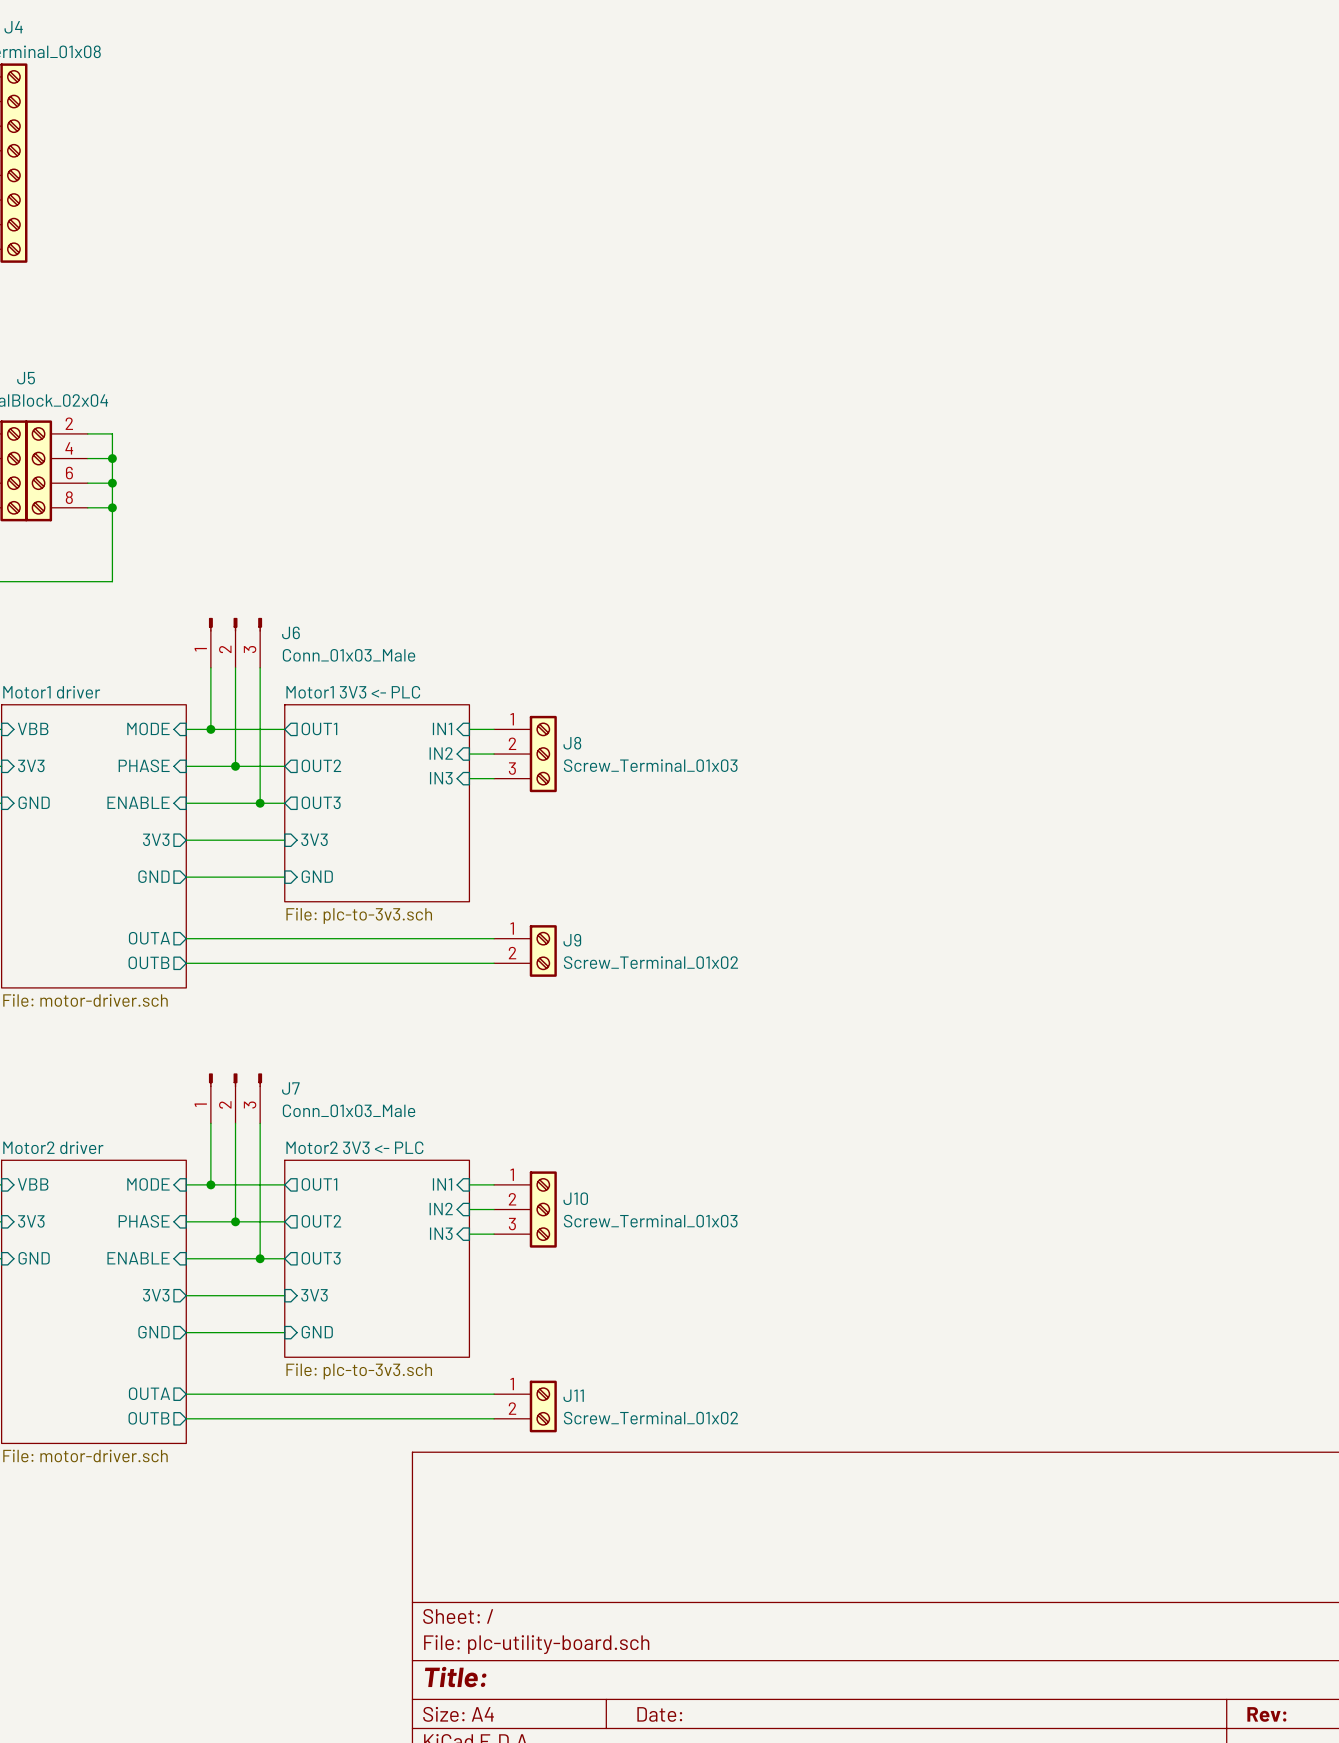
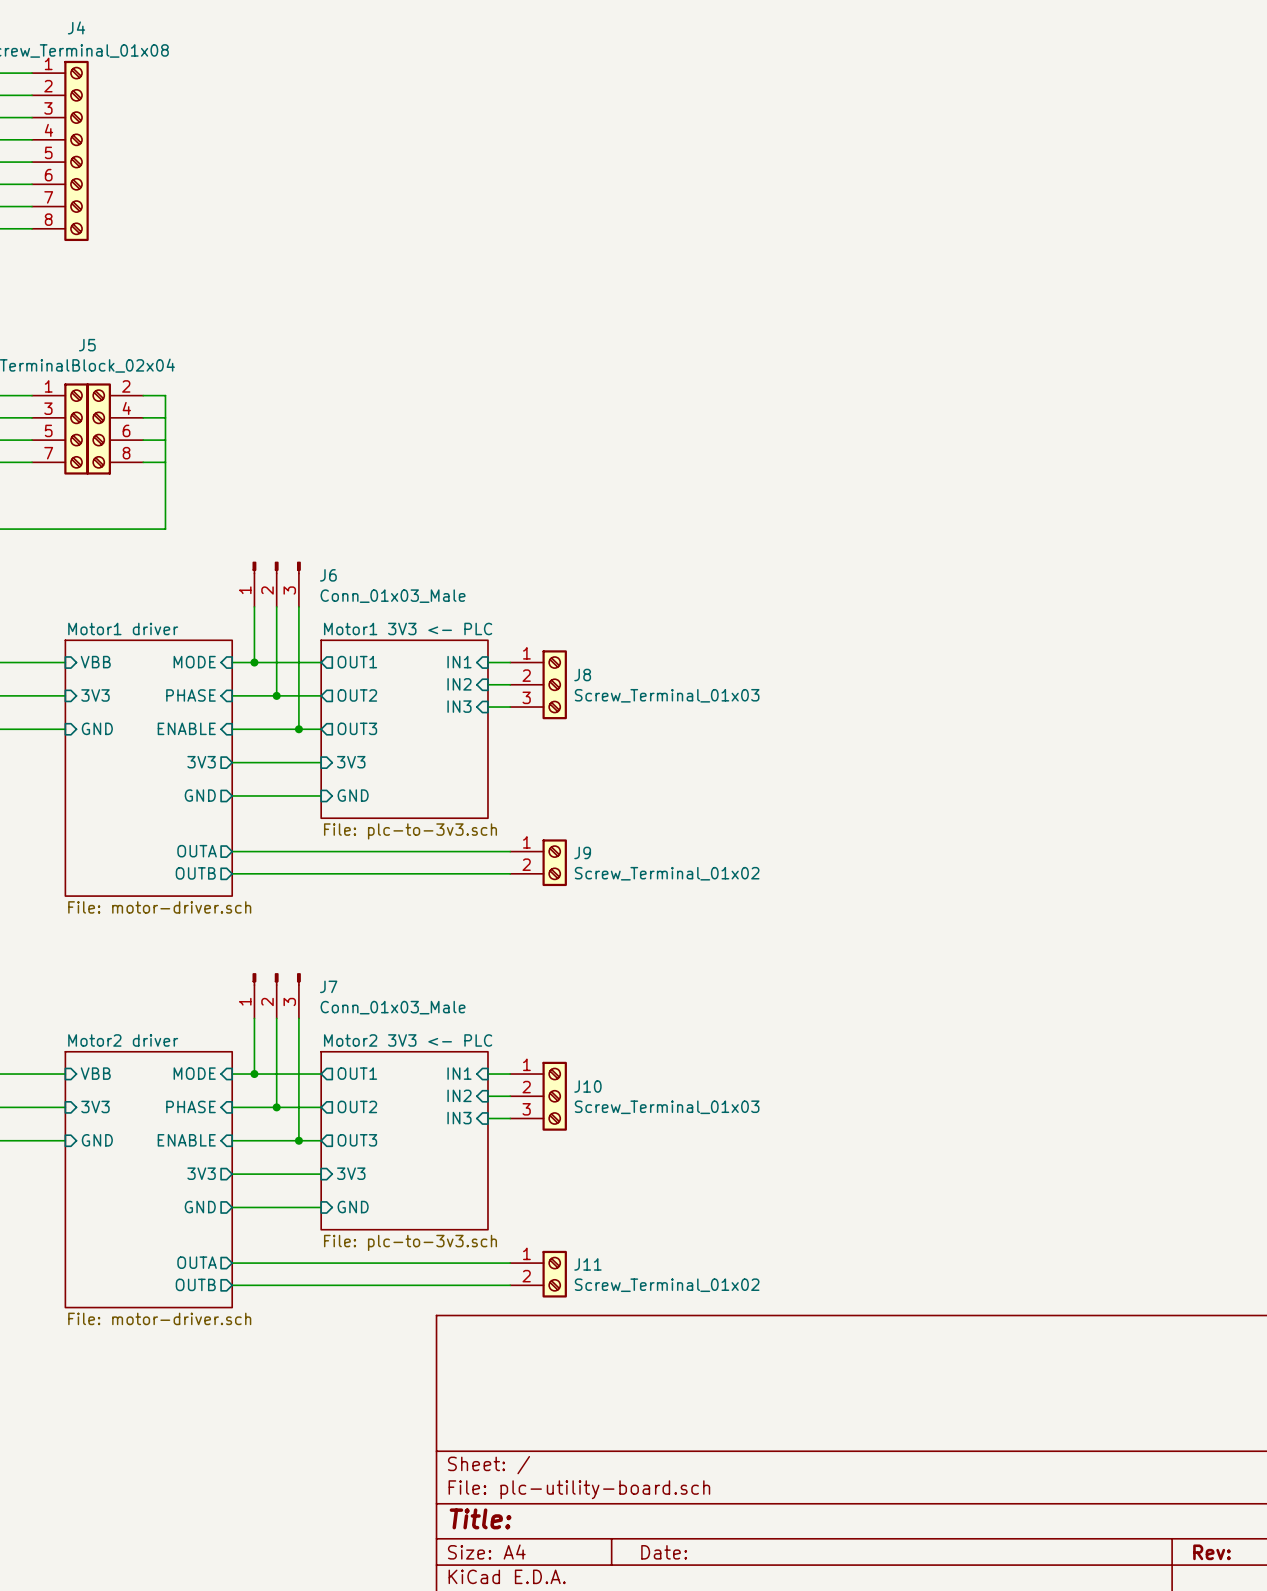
junction: (112, 458) -> none
junction: (112, 483) -> none
junction: (112, 507) -> none

